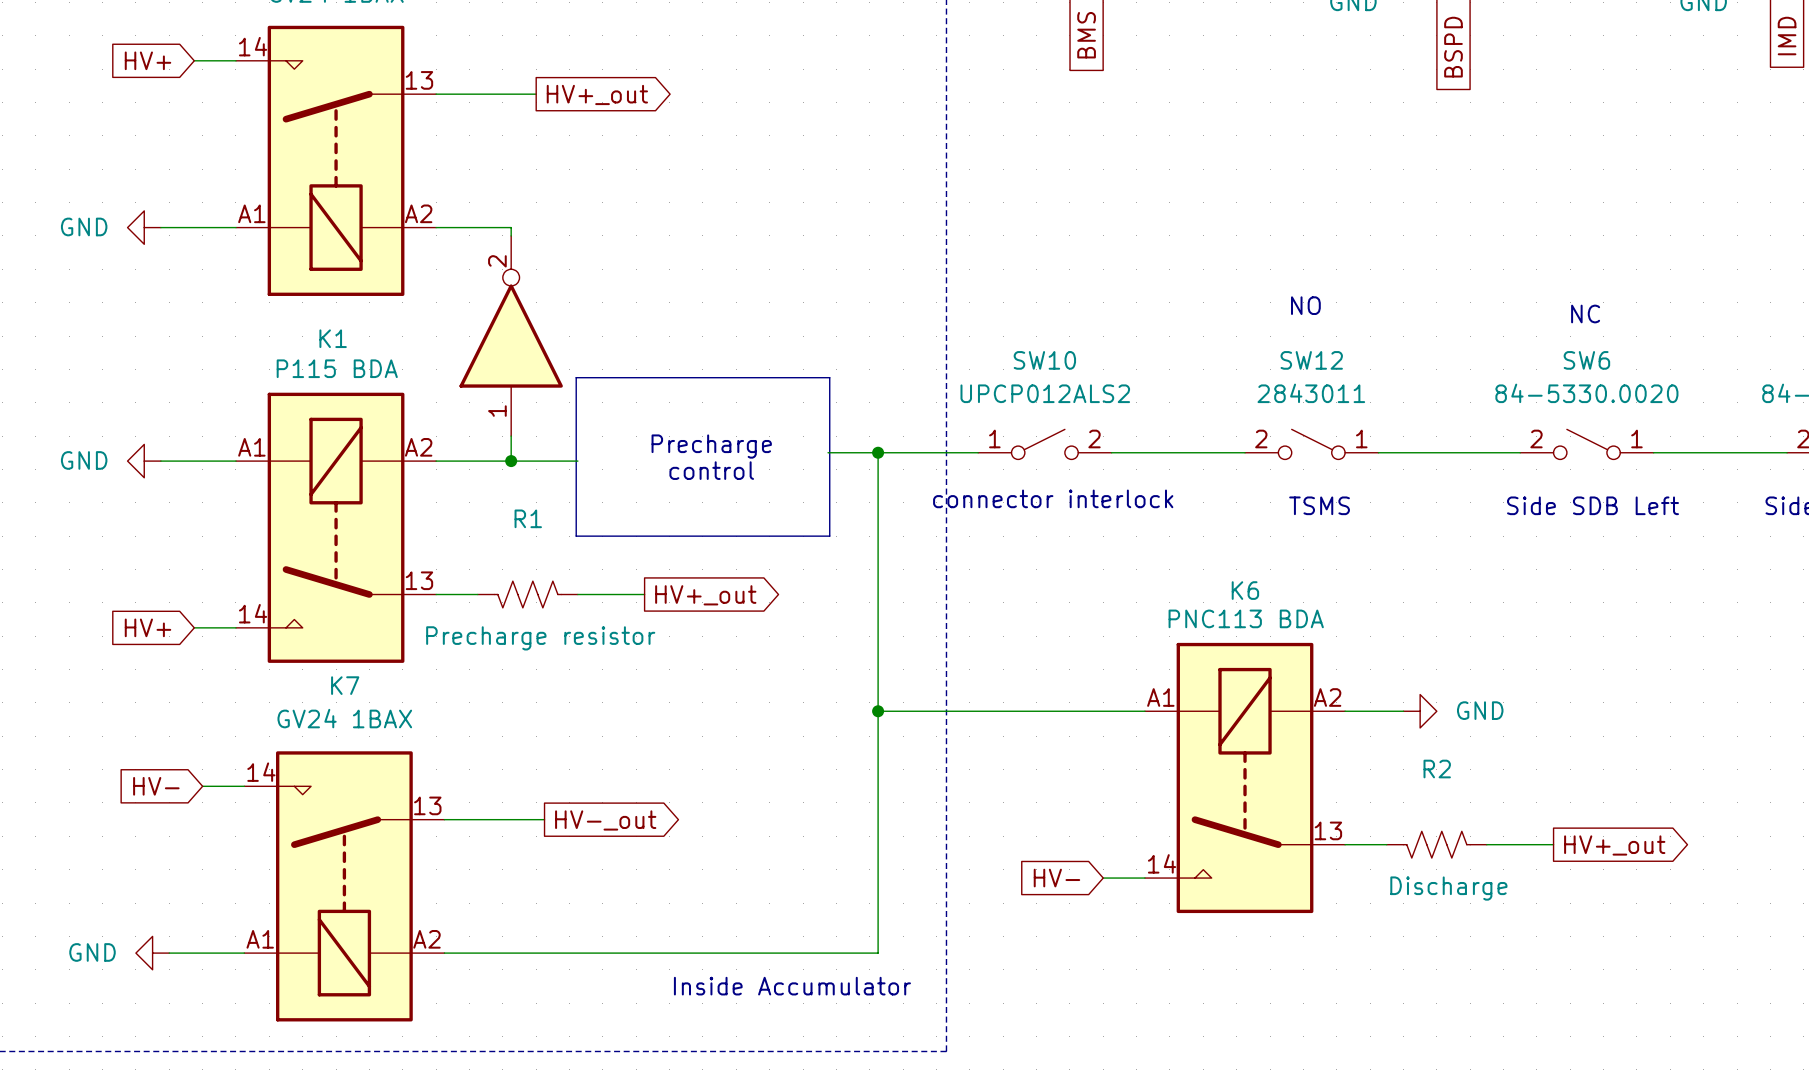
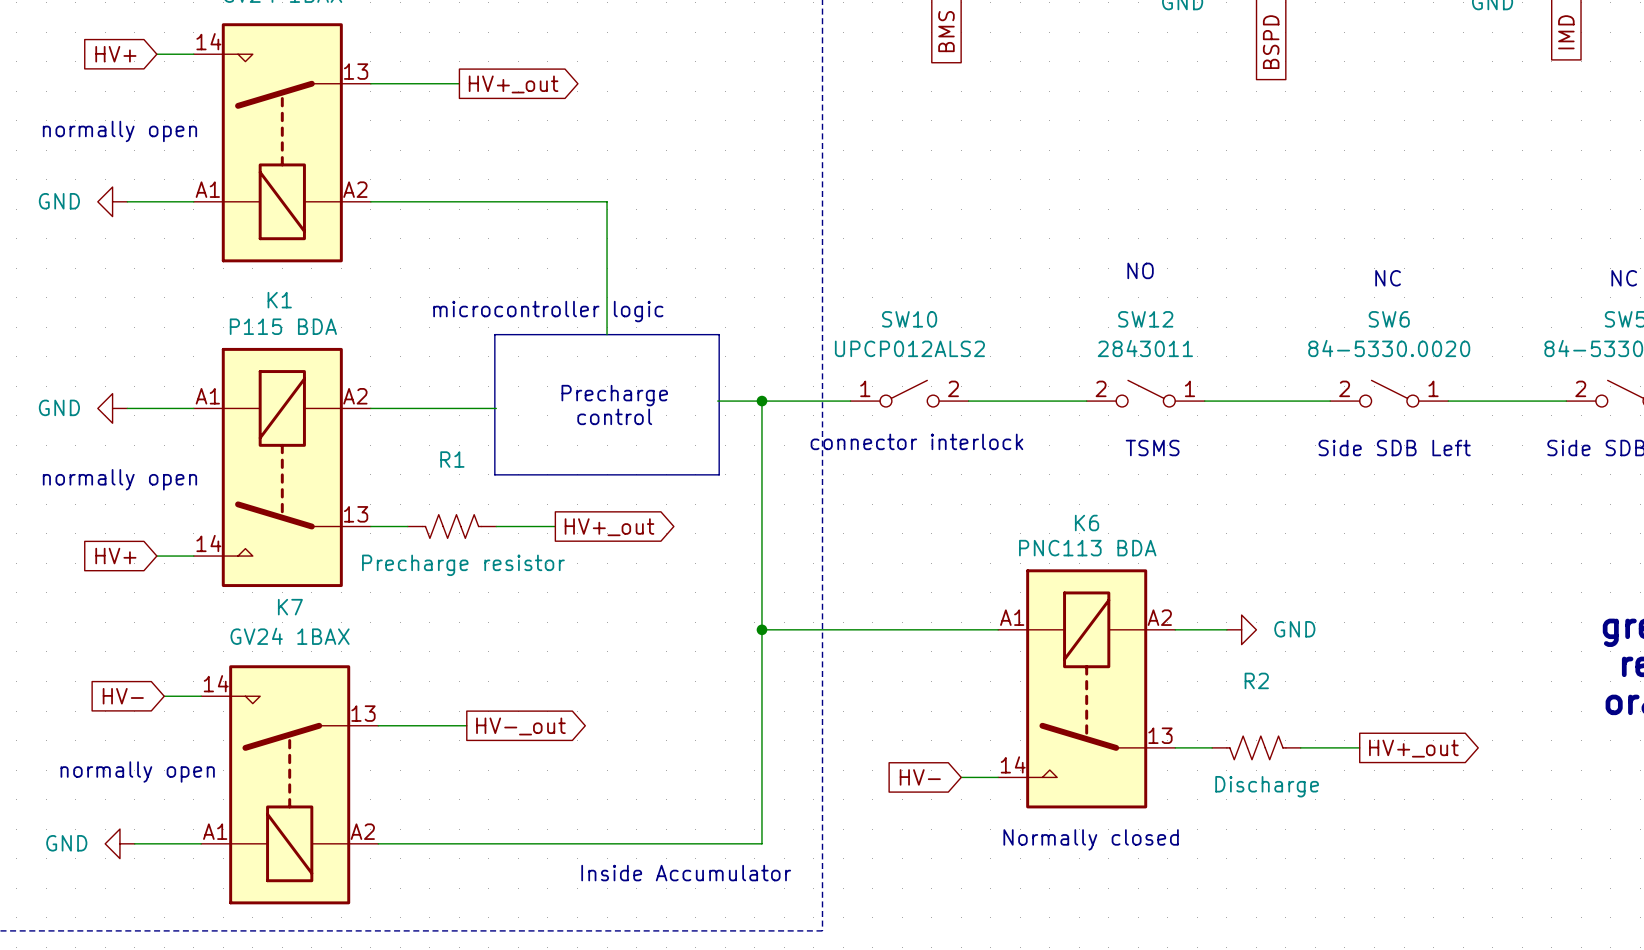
text: none -> normally open (119, 131)
wire: (511, 227) (511, 235) -> (437, 201) (607, 201) (607, 334)
part: (511, 336) -> none
text: none -> microcontroller logic (548, 311)
wire: (511, 436) (511, 461) -> none
junction: (511, 461) -> none
text: none -> normally open (119, 479)
text: none -> normally open (137, 771)
text: none -> Normally closed (1091, 839)

